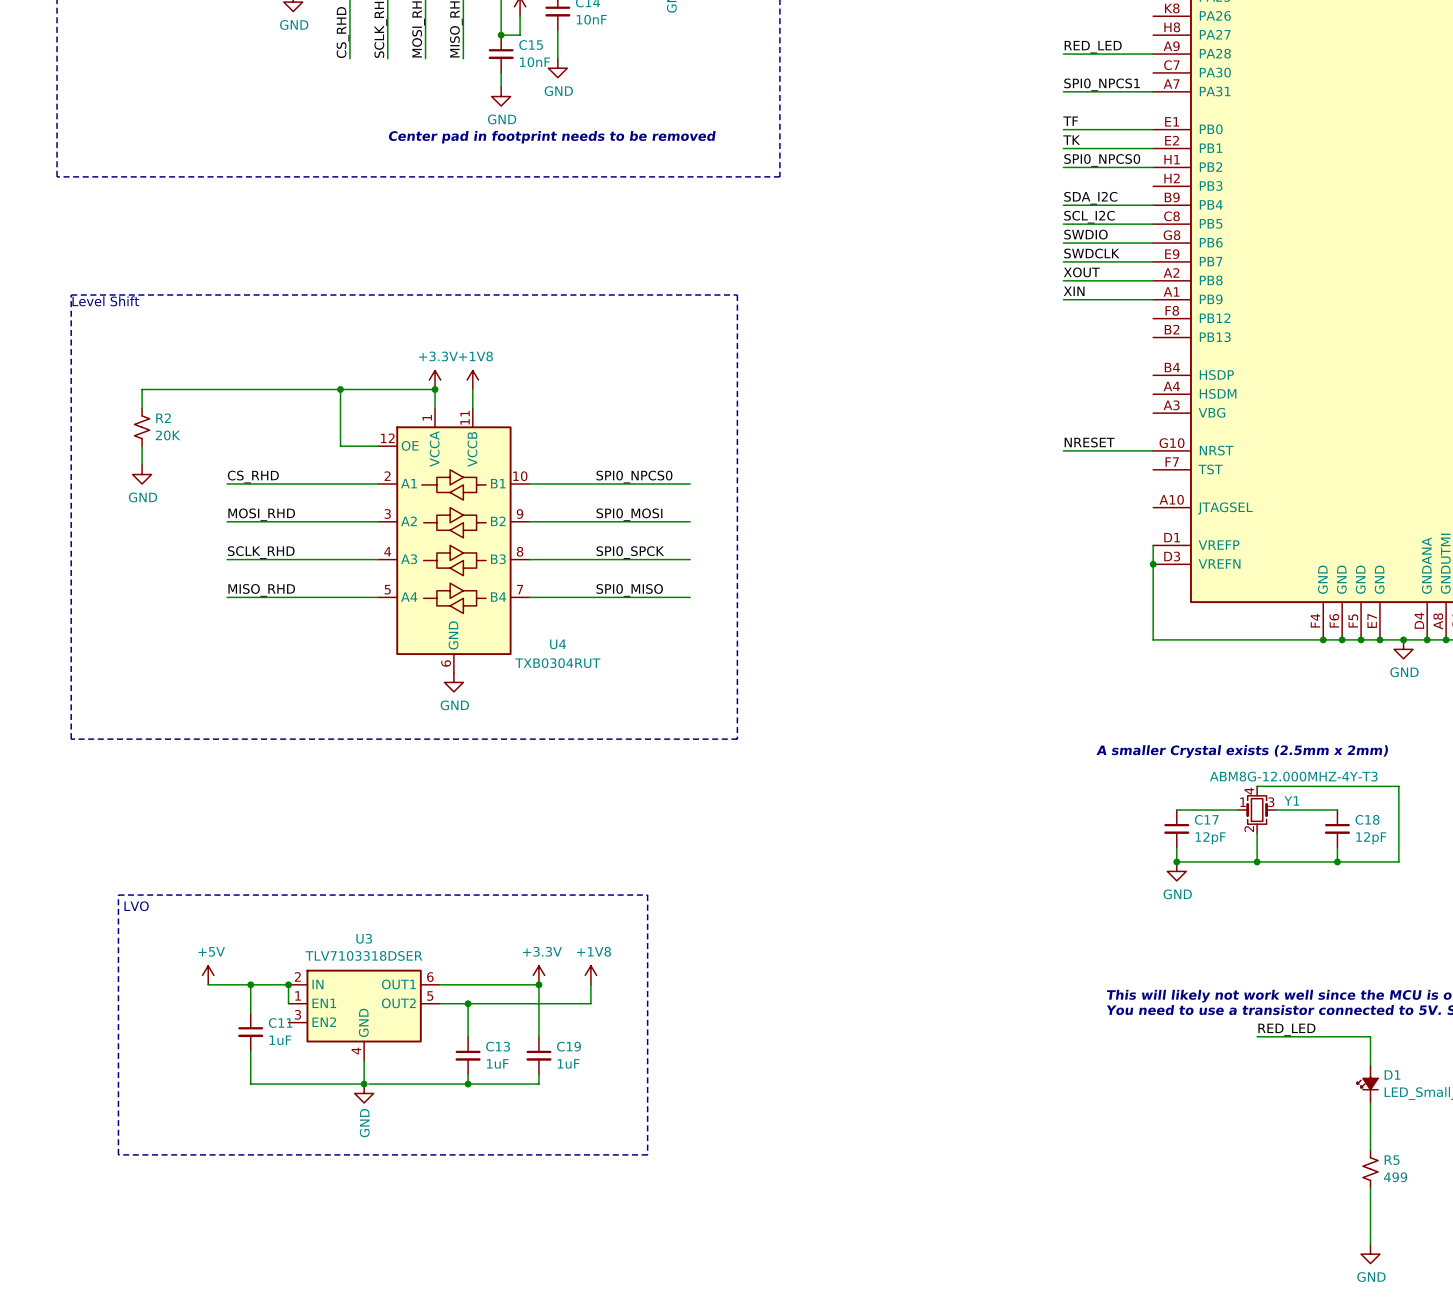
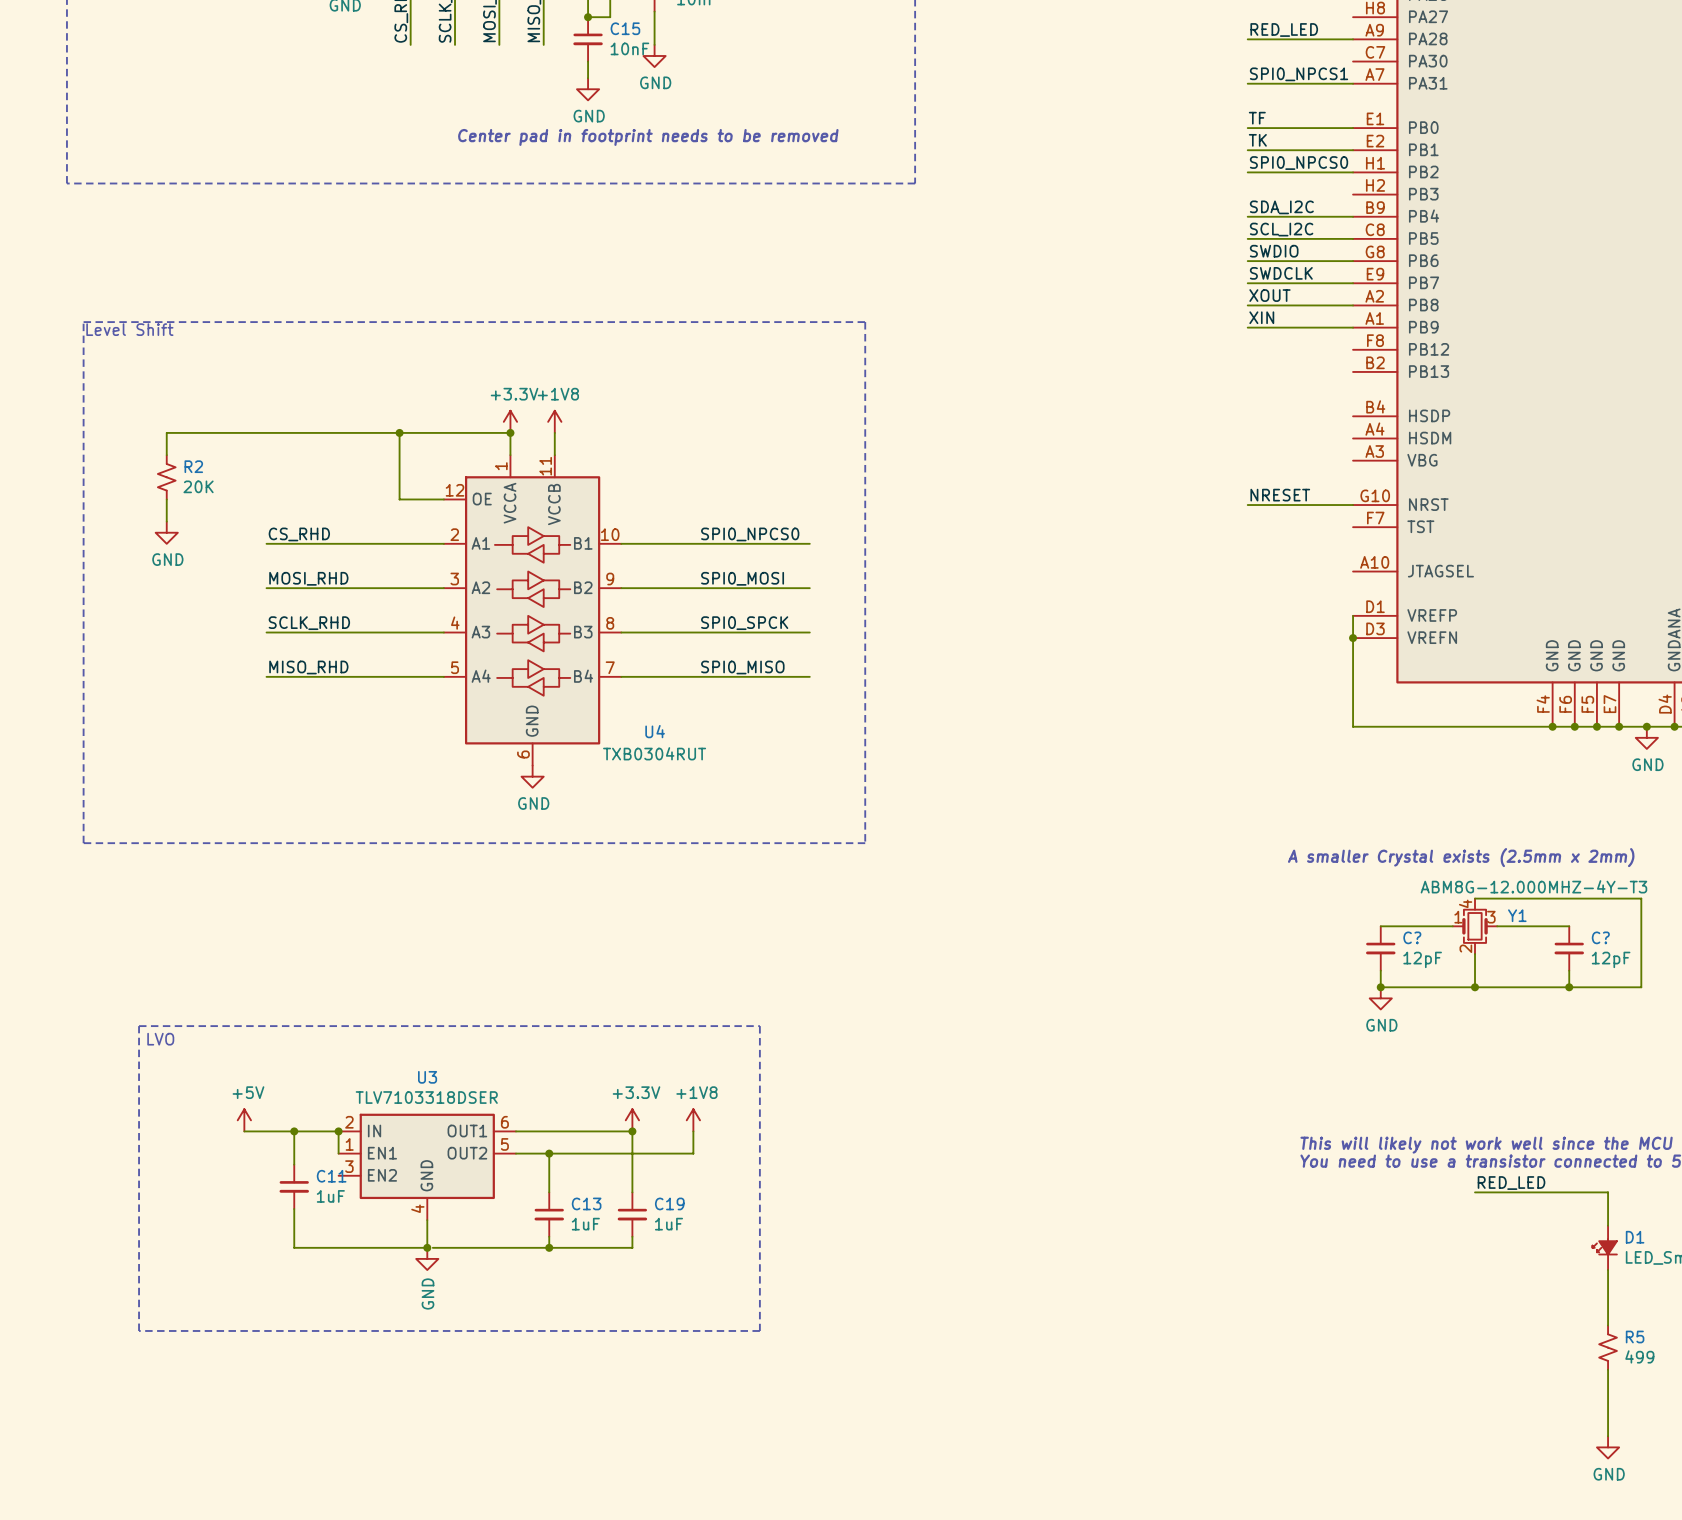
C17 name: C17 (1206, 819) -> C? (1412, 937)
C18 name: C18 (1367, 819) -> C? (1600, 937)

